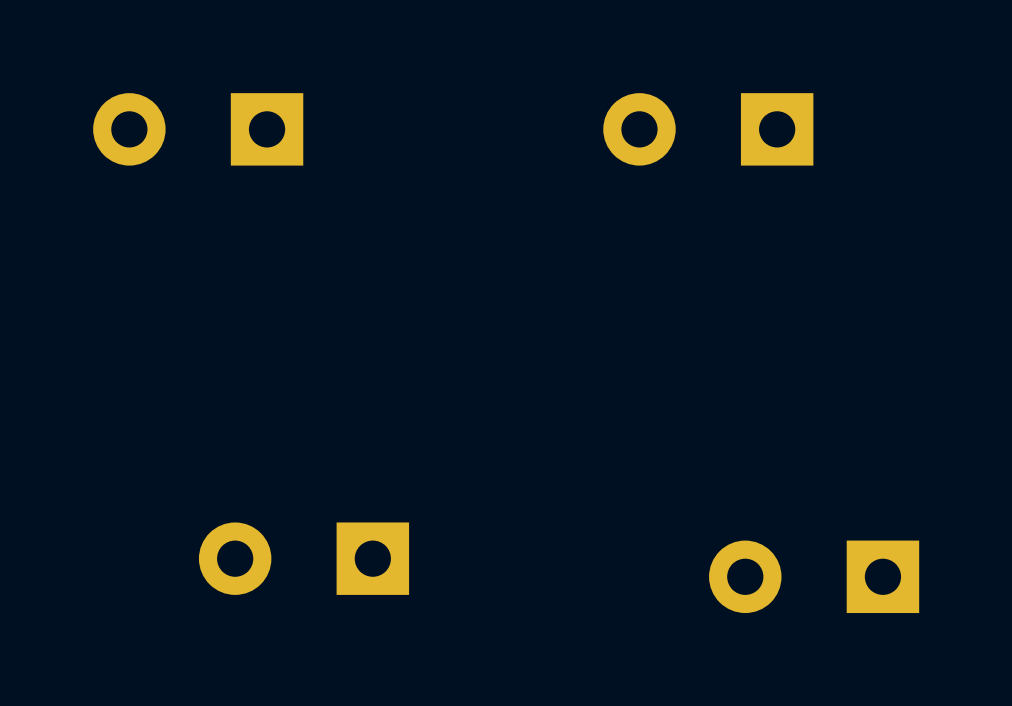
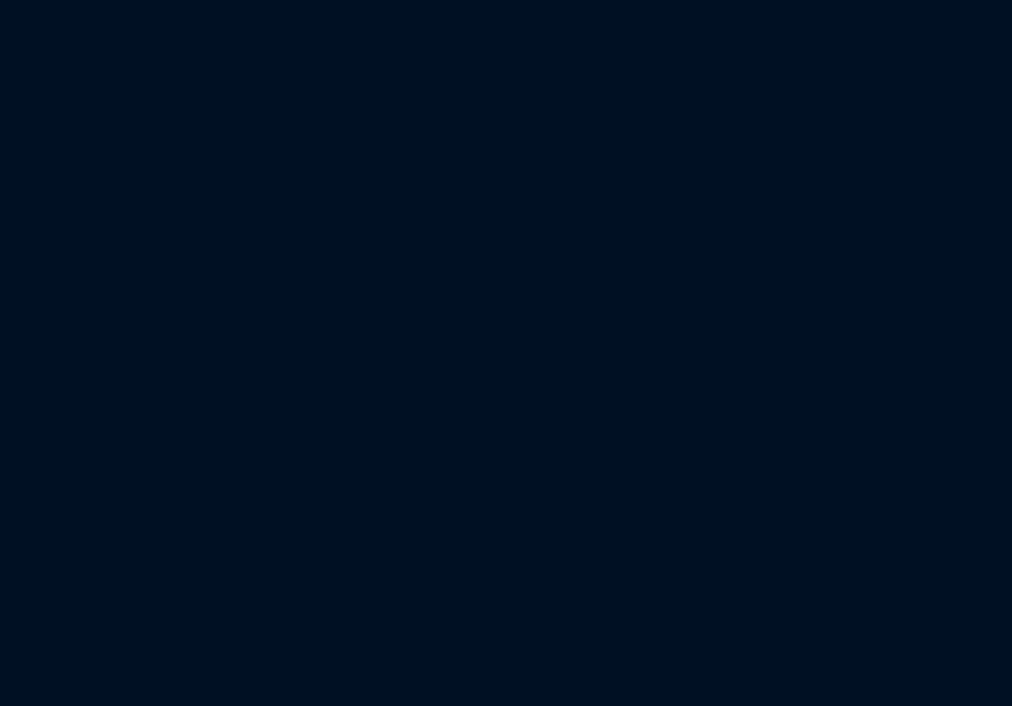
part: (198, 129) -> none
part: (708, 129) -> none
part: (303, 558) -> none
part: (814, 576) -> none

